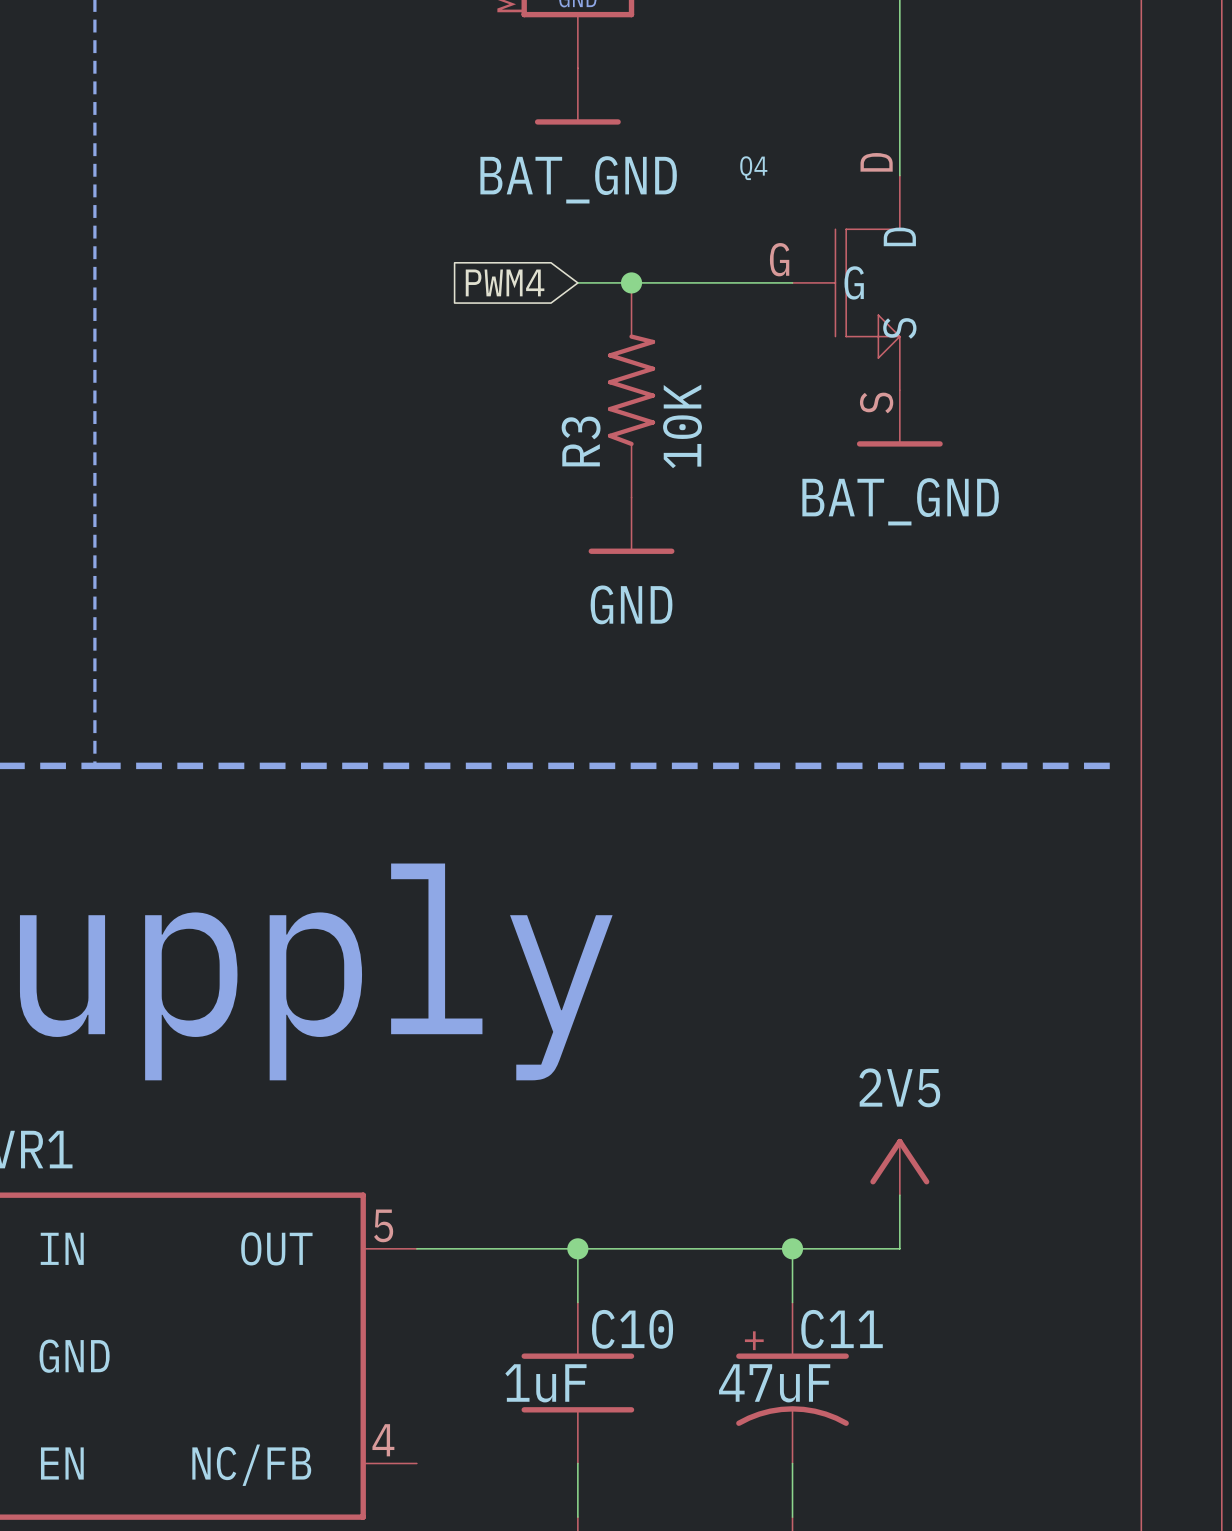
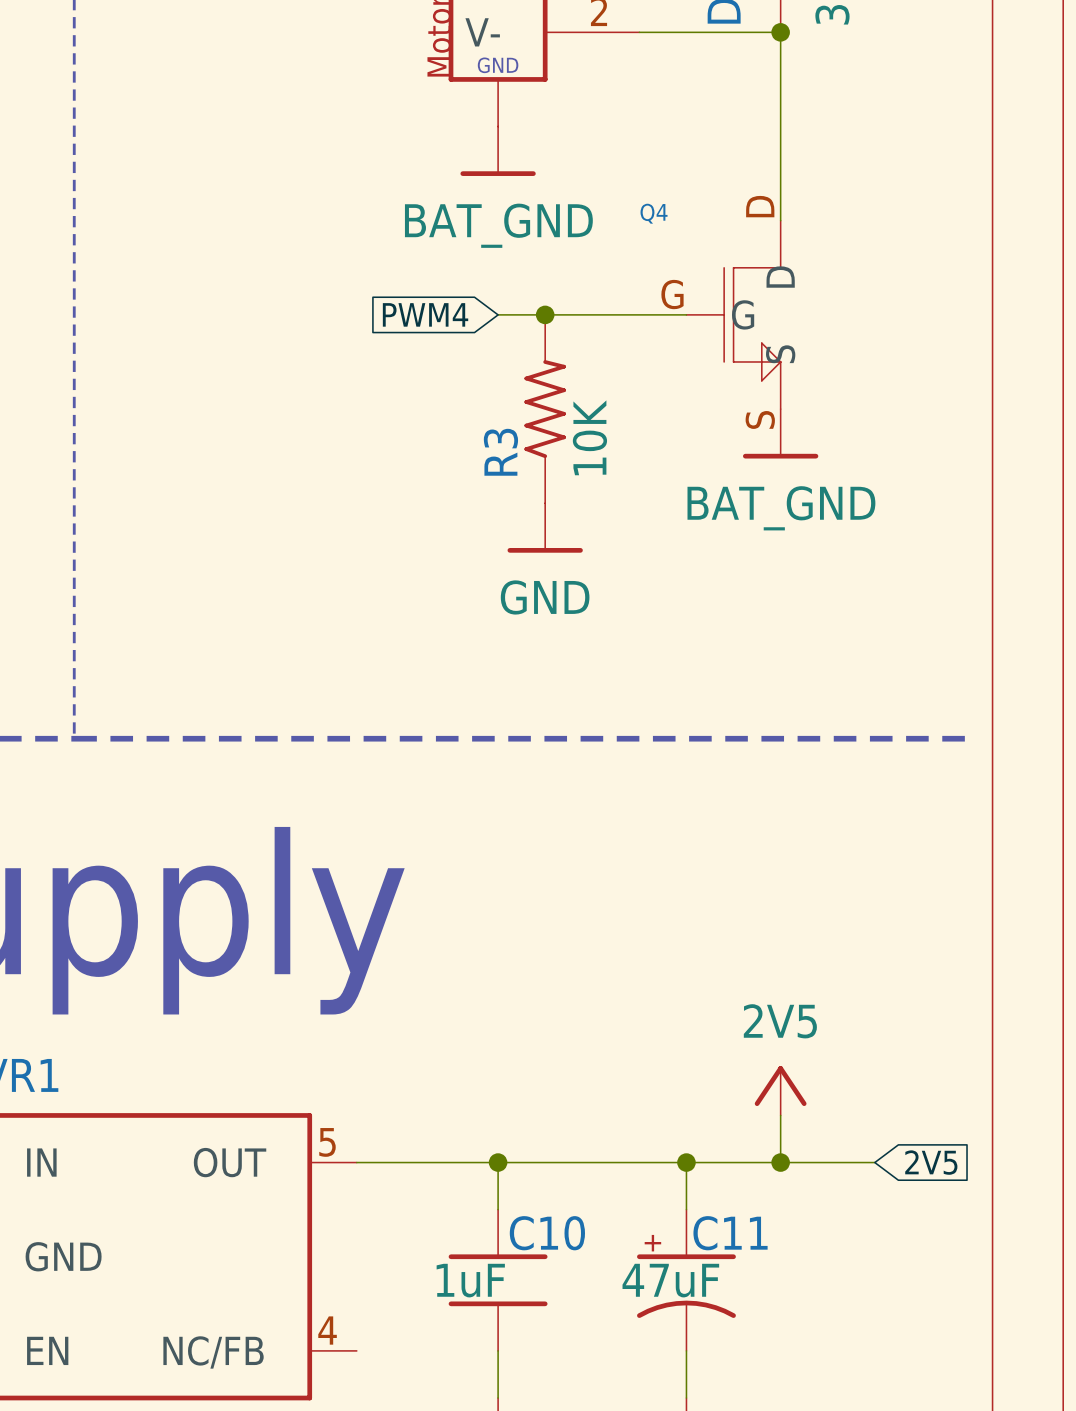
wire: none -> (780, 1162) (874, 1162)
junction: none -> (780, 1162)
global label: none -> 2V5 (931, 1162)

